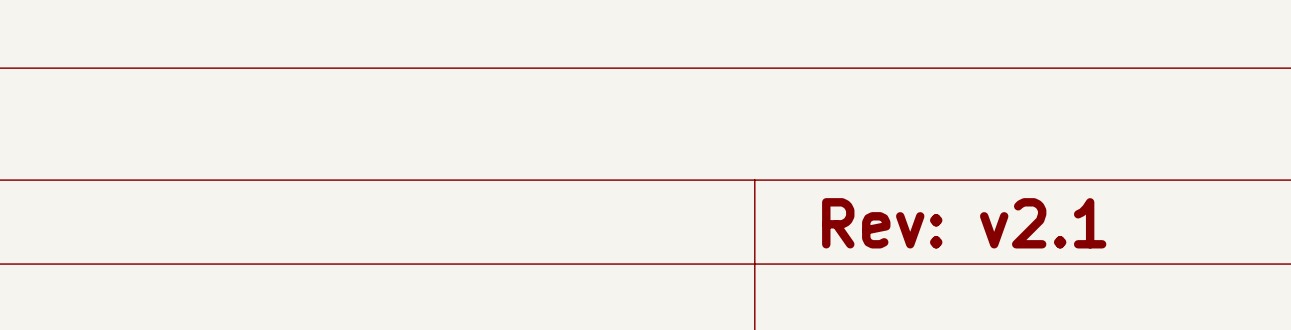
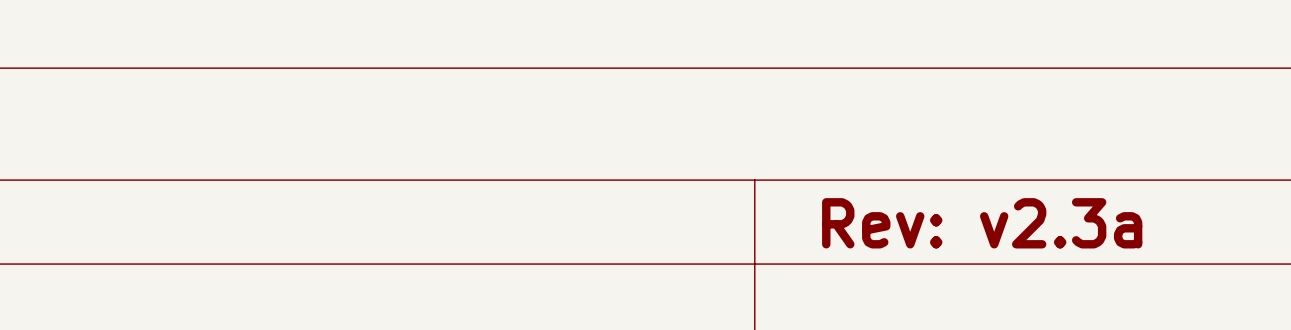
title block: Rev: v2.1 (964, 223) -> Rev: v2.3a (982, 223)

